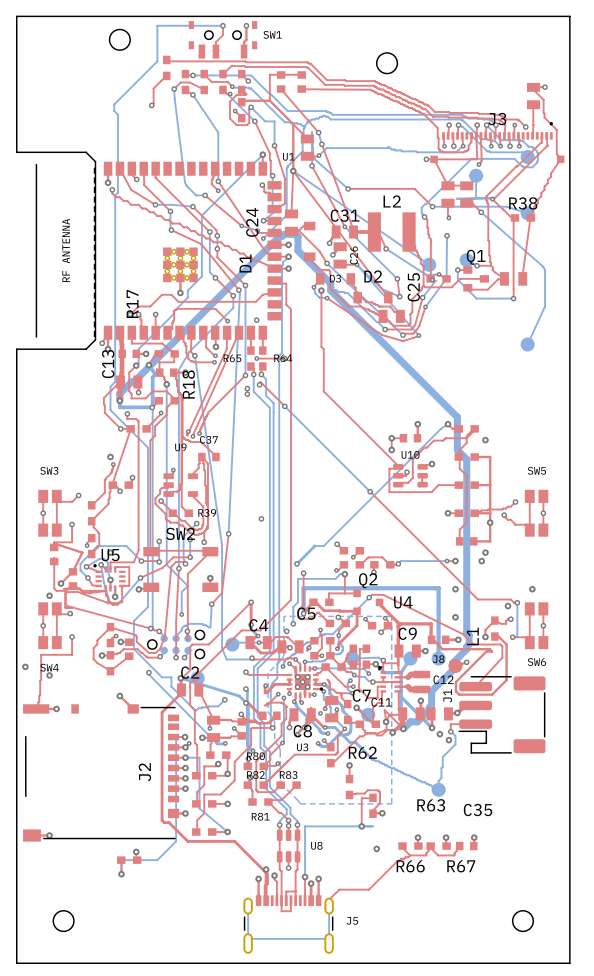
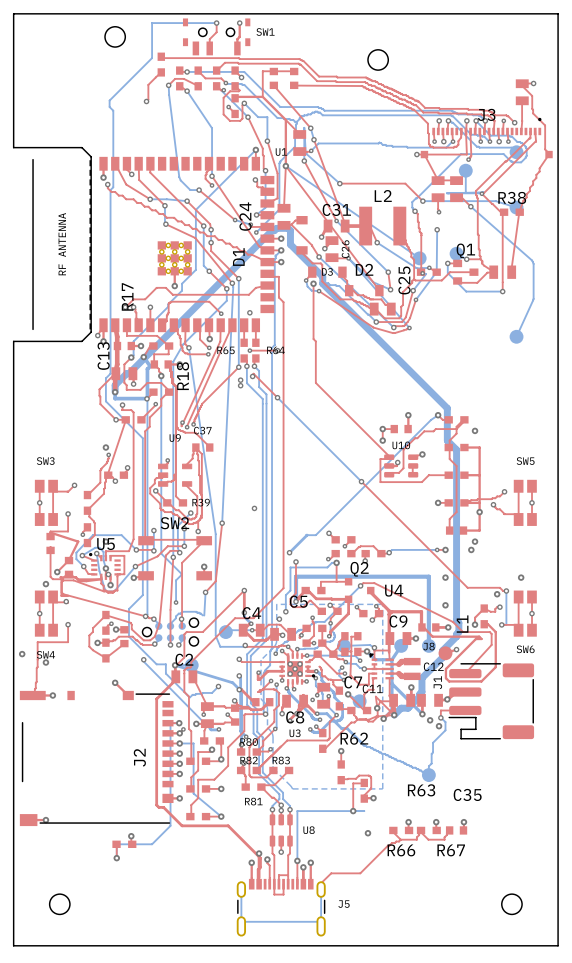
via: none -> (108, 574)

